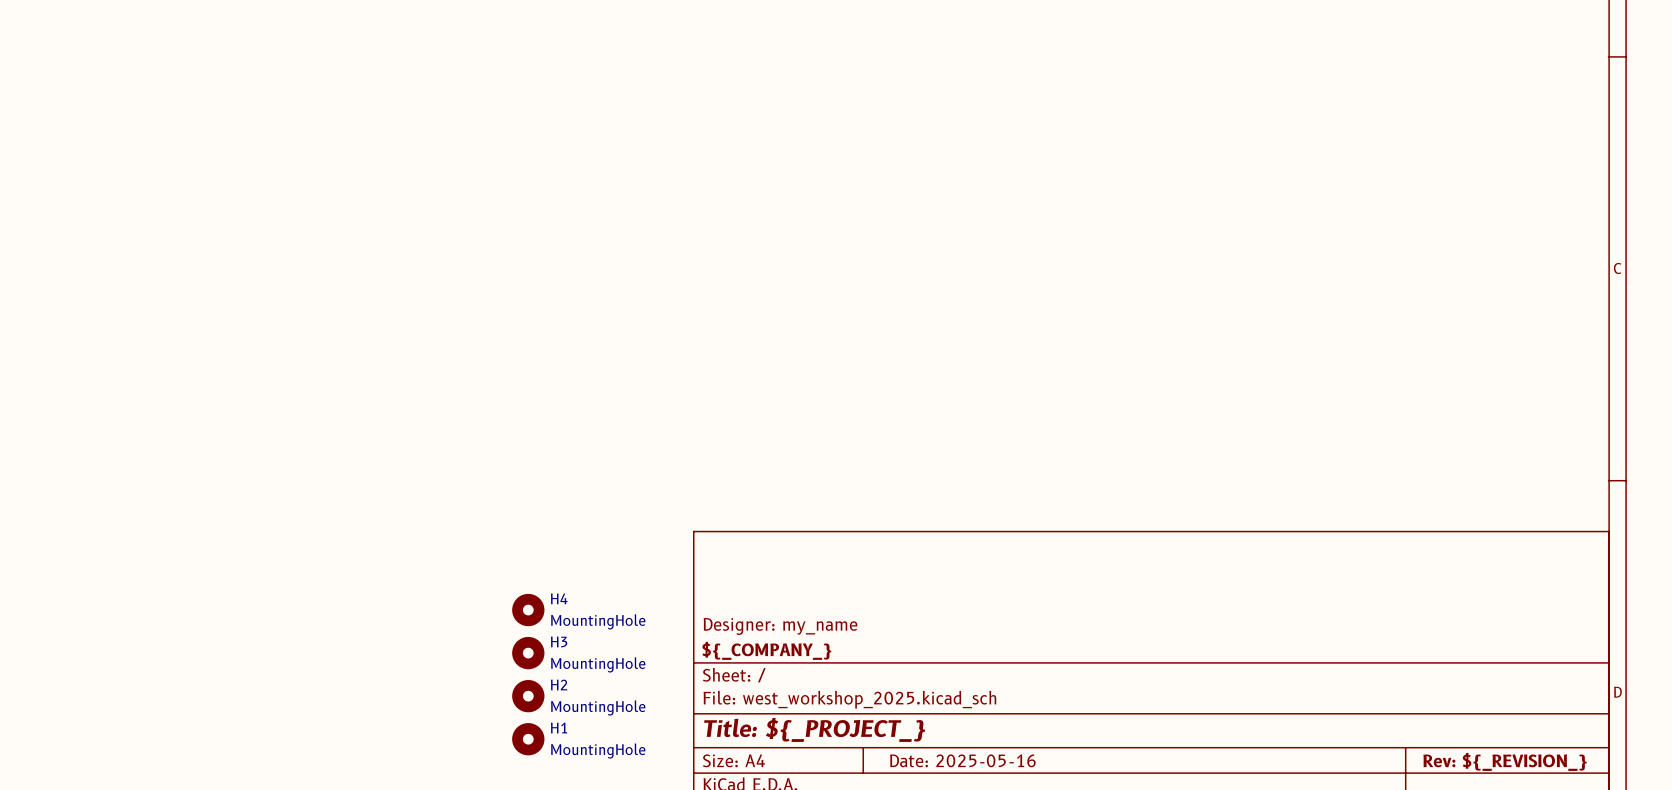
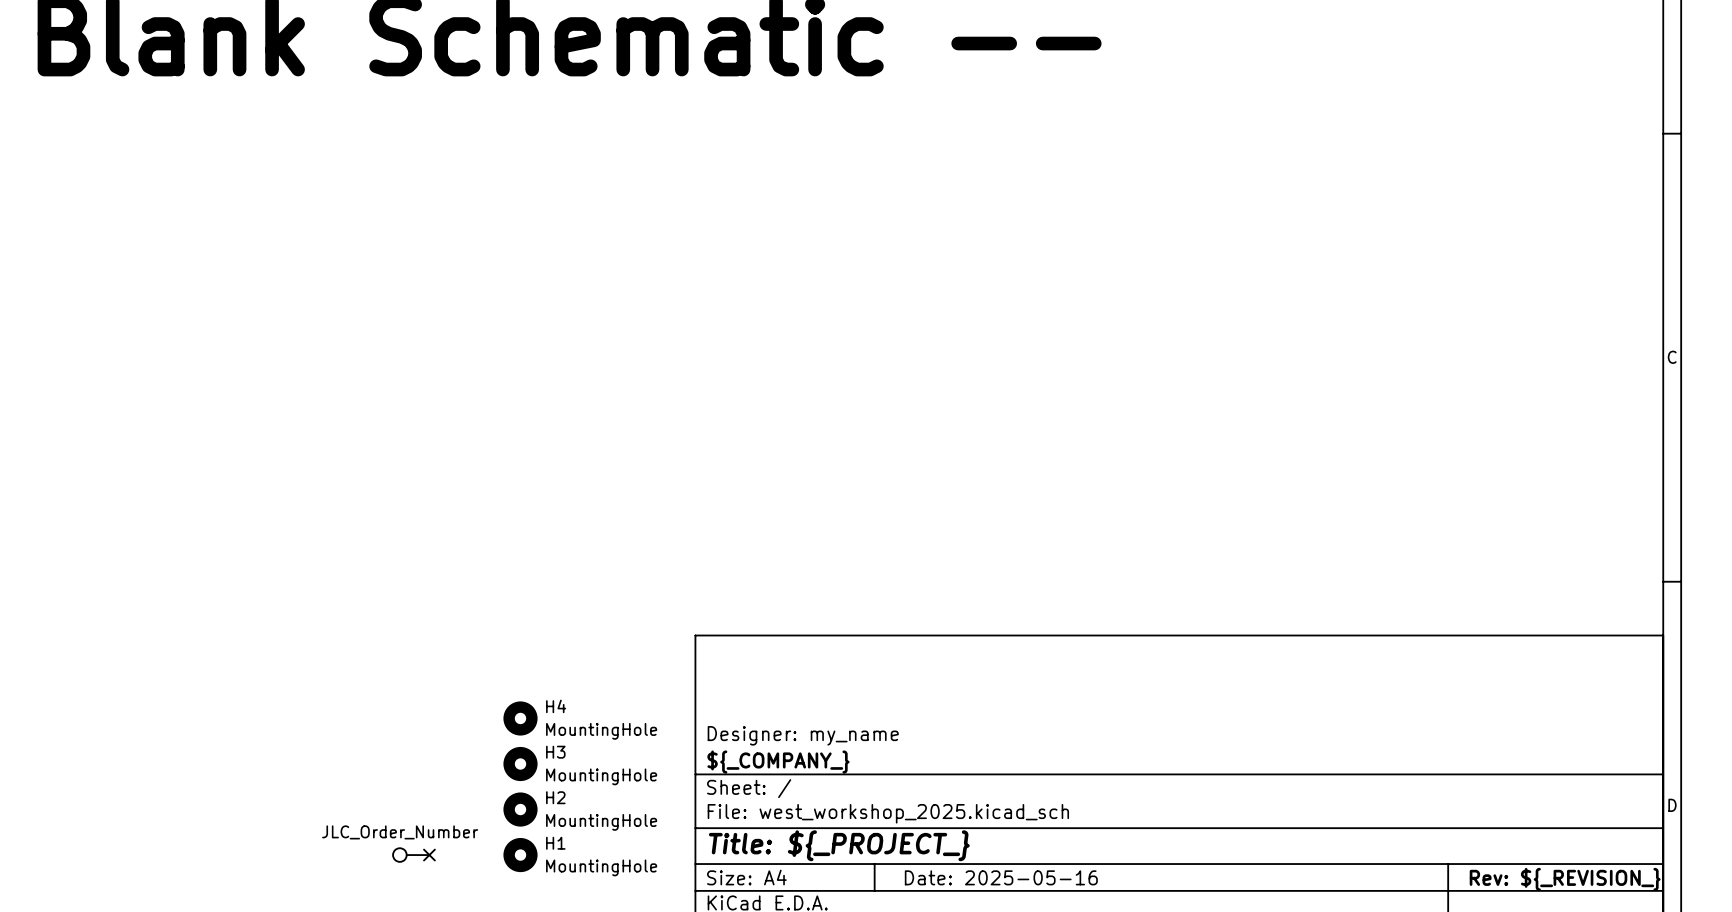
part: none -> JLC_Order_Number (411, 855)
no-connect mark: none -> (429, 855)

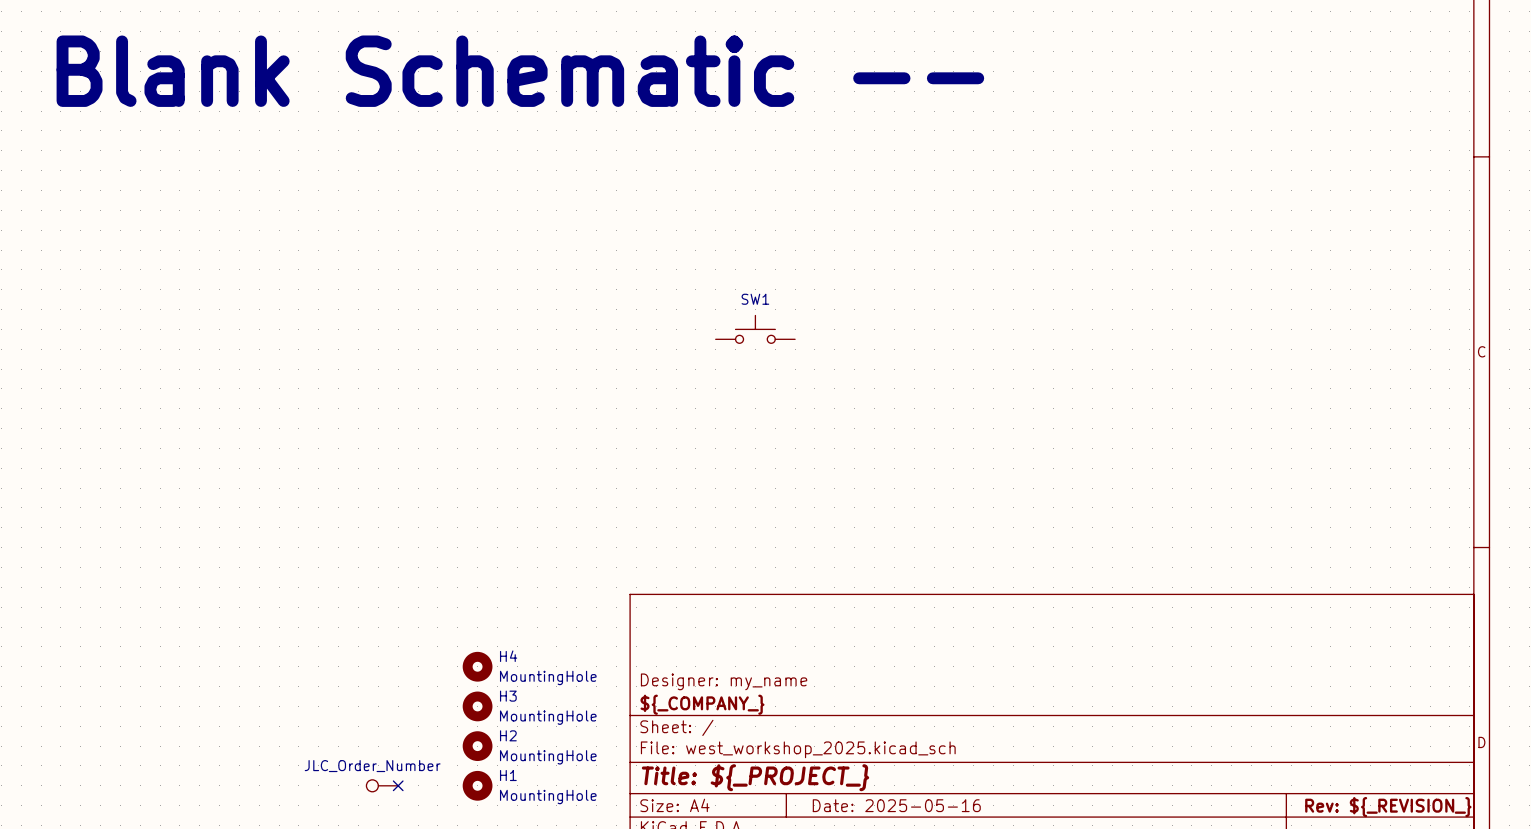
SW1: none -> (755, 329)

